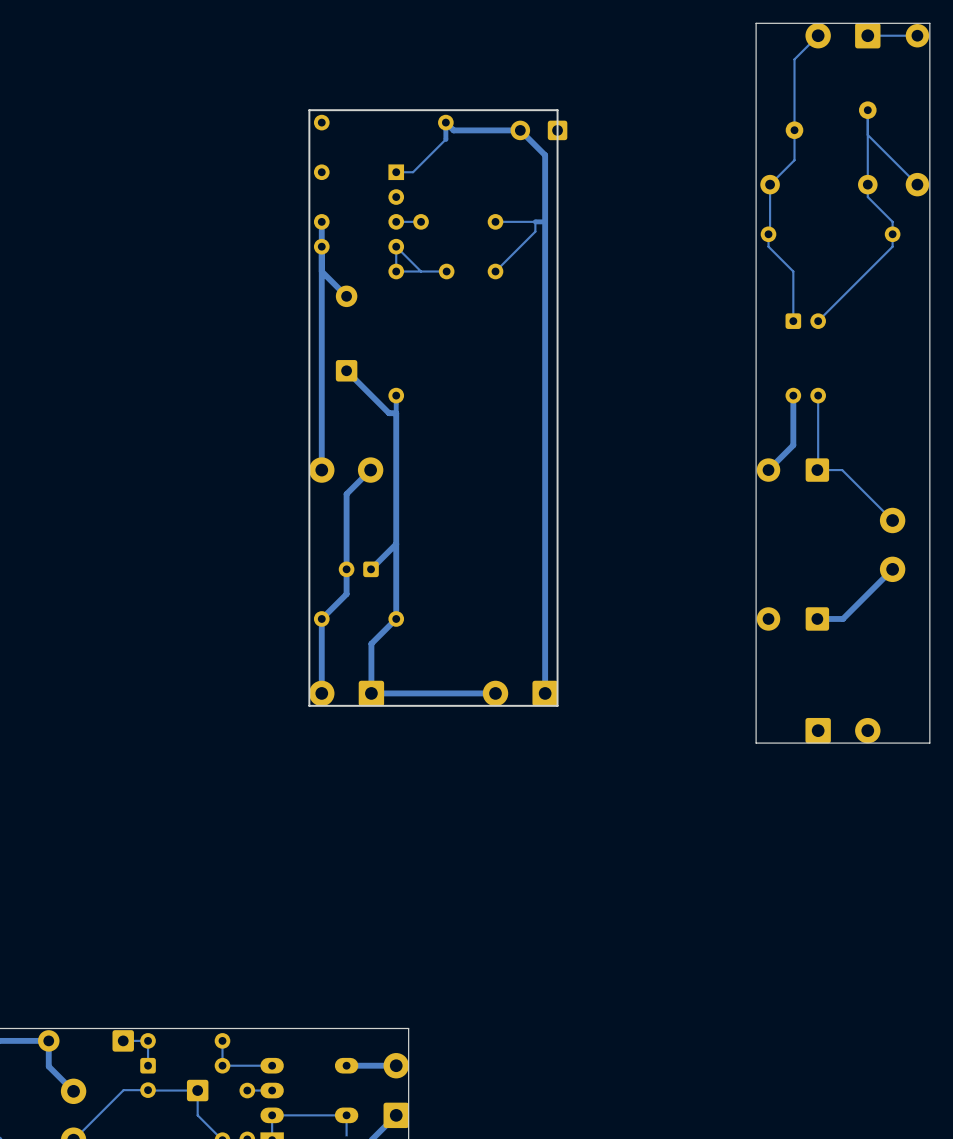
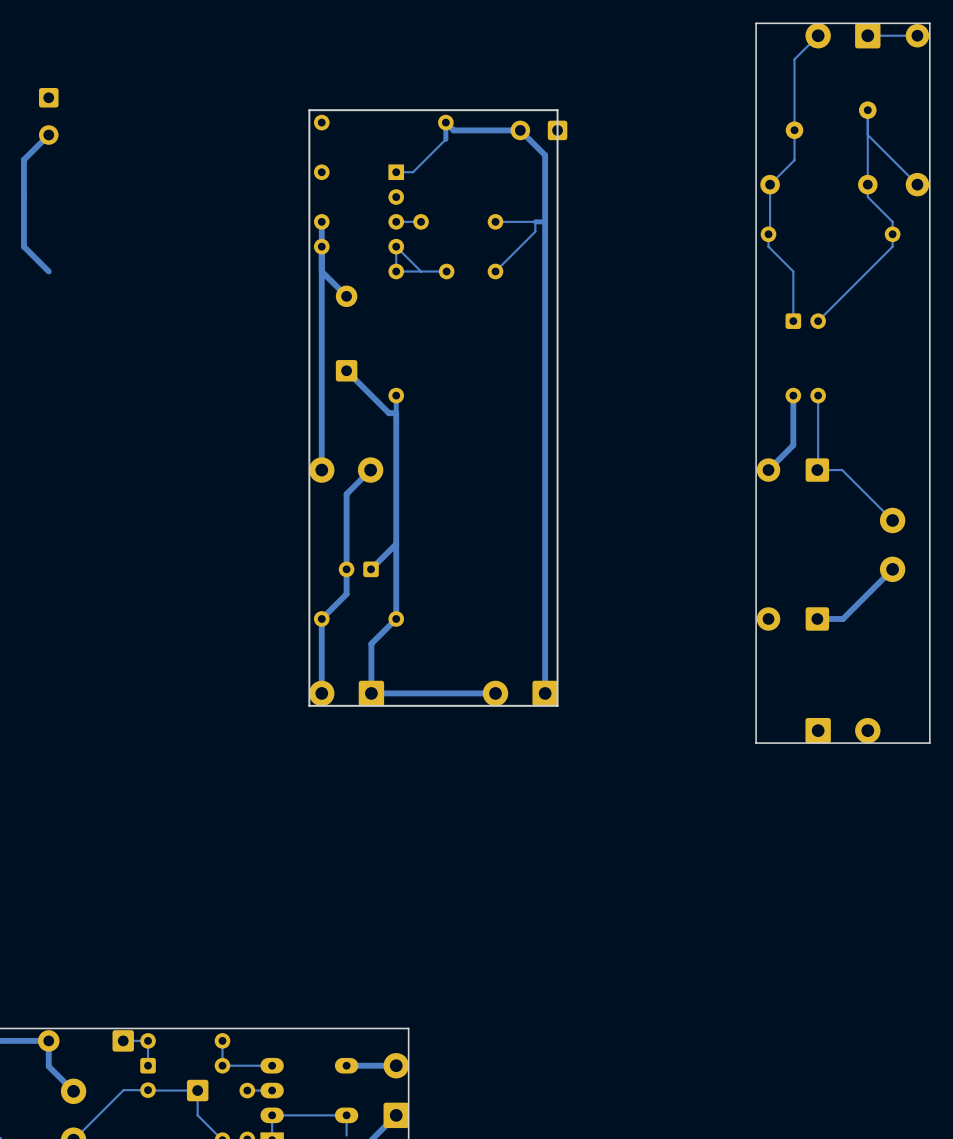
part: none -> (48, 116)
track: none -> (48, 135) (23, 159) (23, 246) (48, 271)

